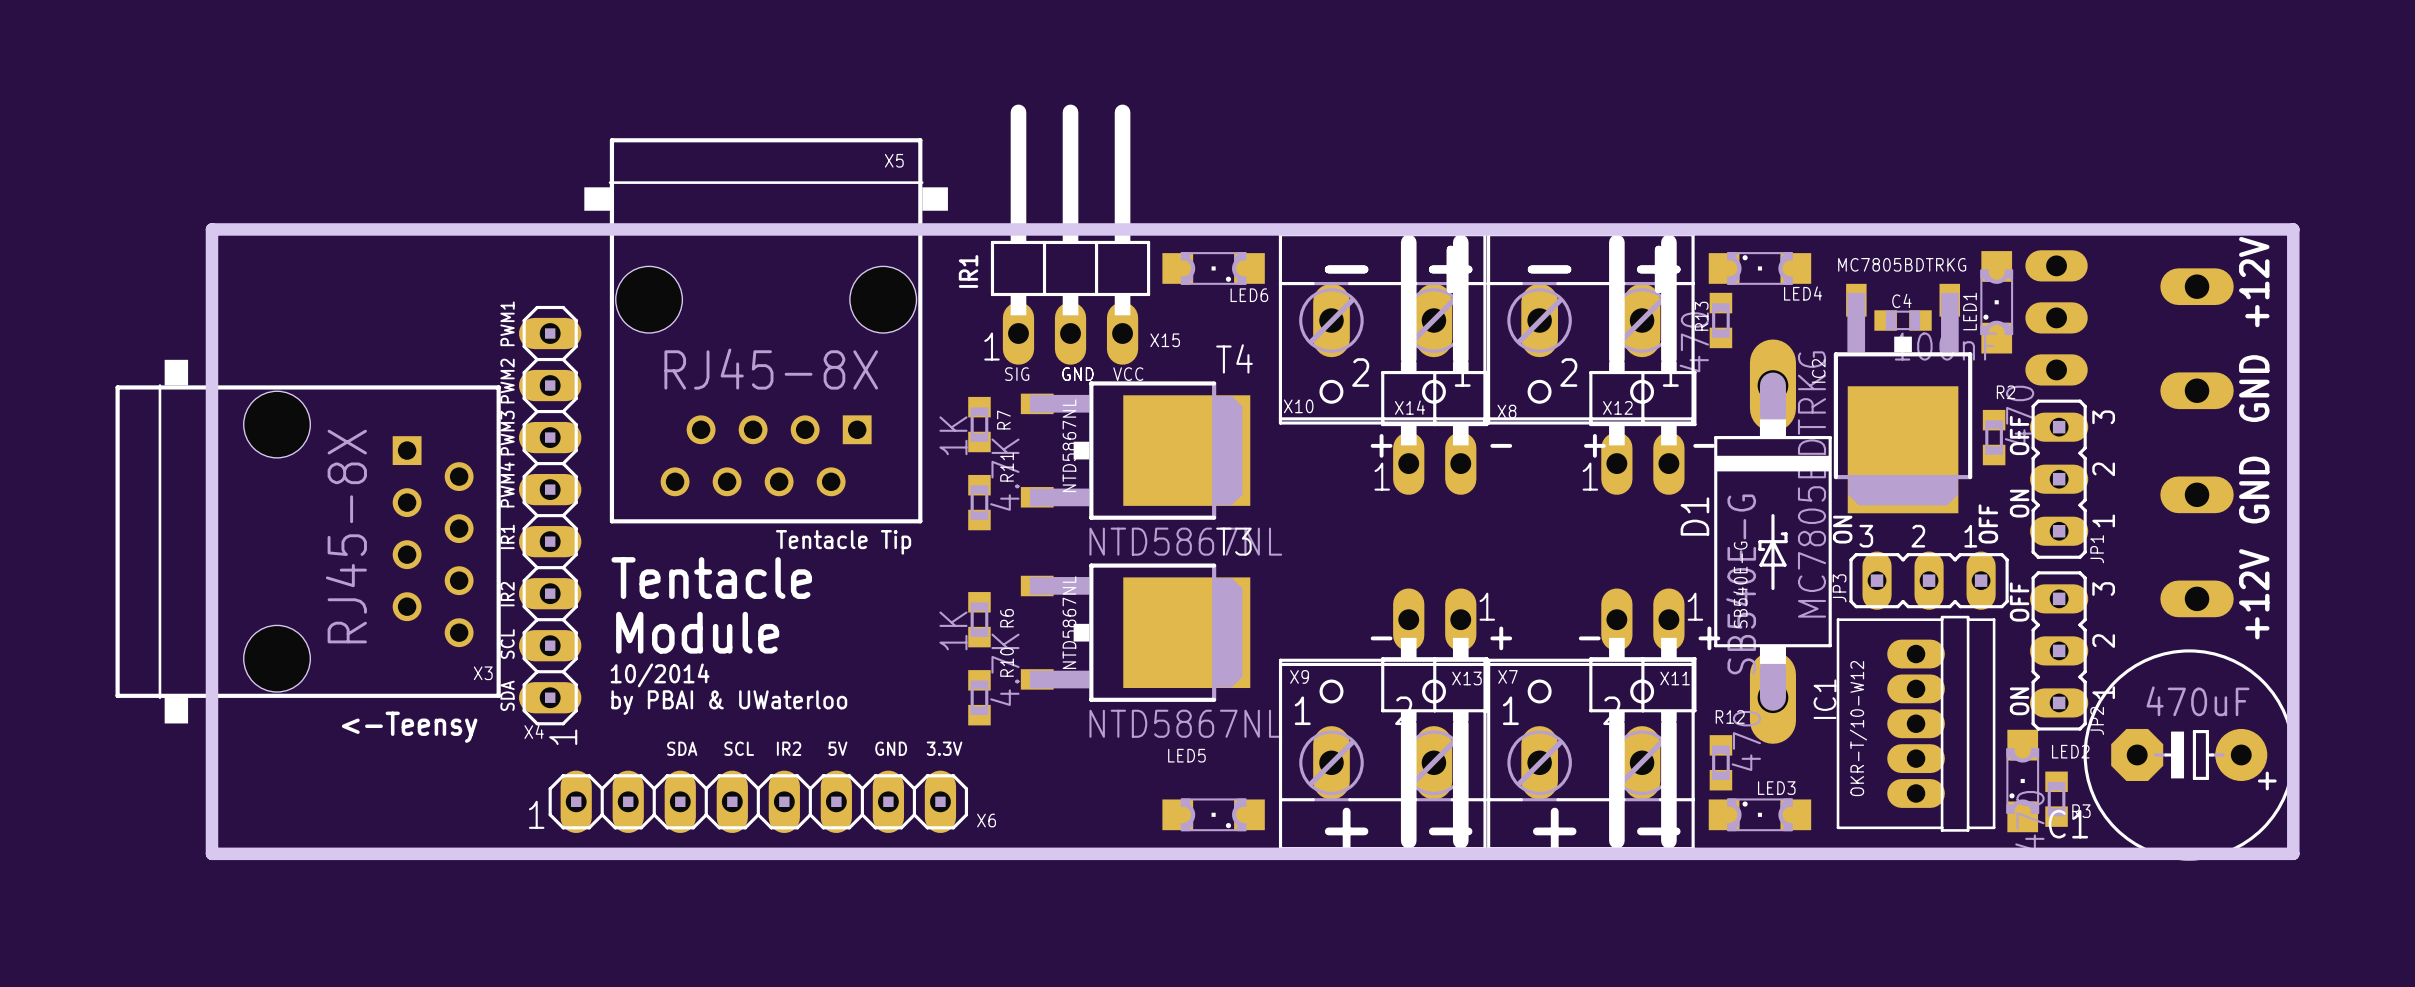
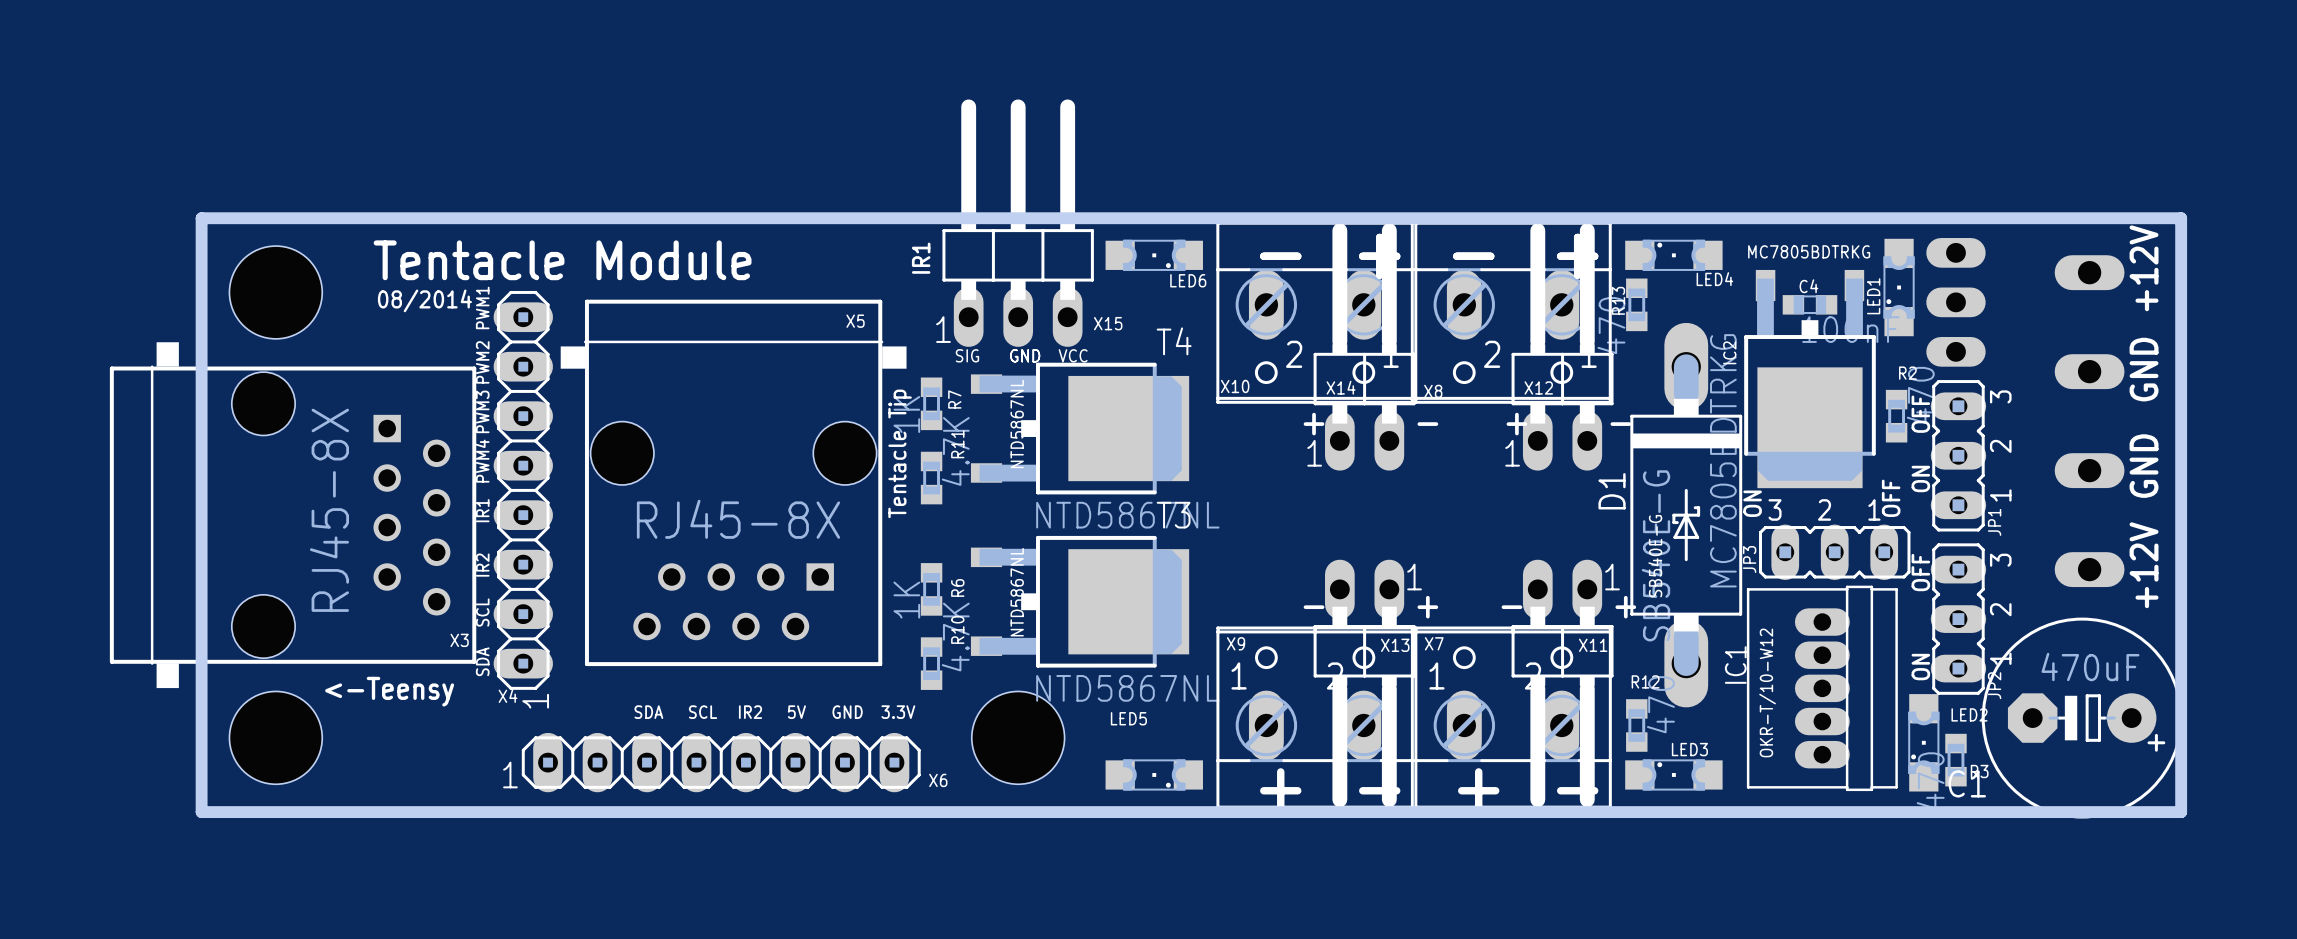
text: none -> Tentacle Module (562, 260)
hole: none -> (275, 292)
text: none -> 08/2014 (424, 300)
X5 position: (766, 330) -> (733, 482)
text rotation: 0° (843, 542) -> 90° counterclockwise (900, 453)
text: Tentacle (711, 578) -> none
text: Module (697, 632) -> none
text: 10/2014 (660, 675) -> none
text: by PBAI & UWaterloo (729, 702) -> none
hole: none -> (275, 737)
hole: none -> (1018, 737)

